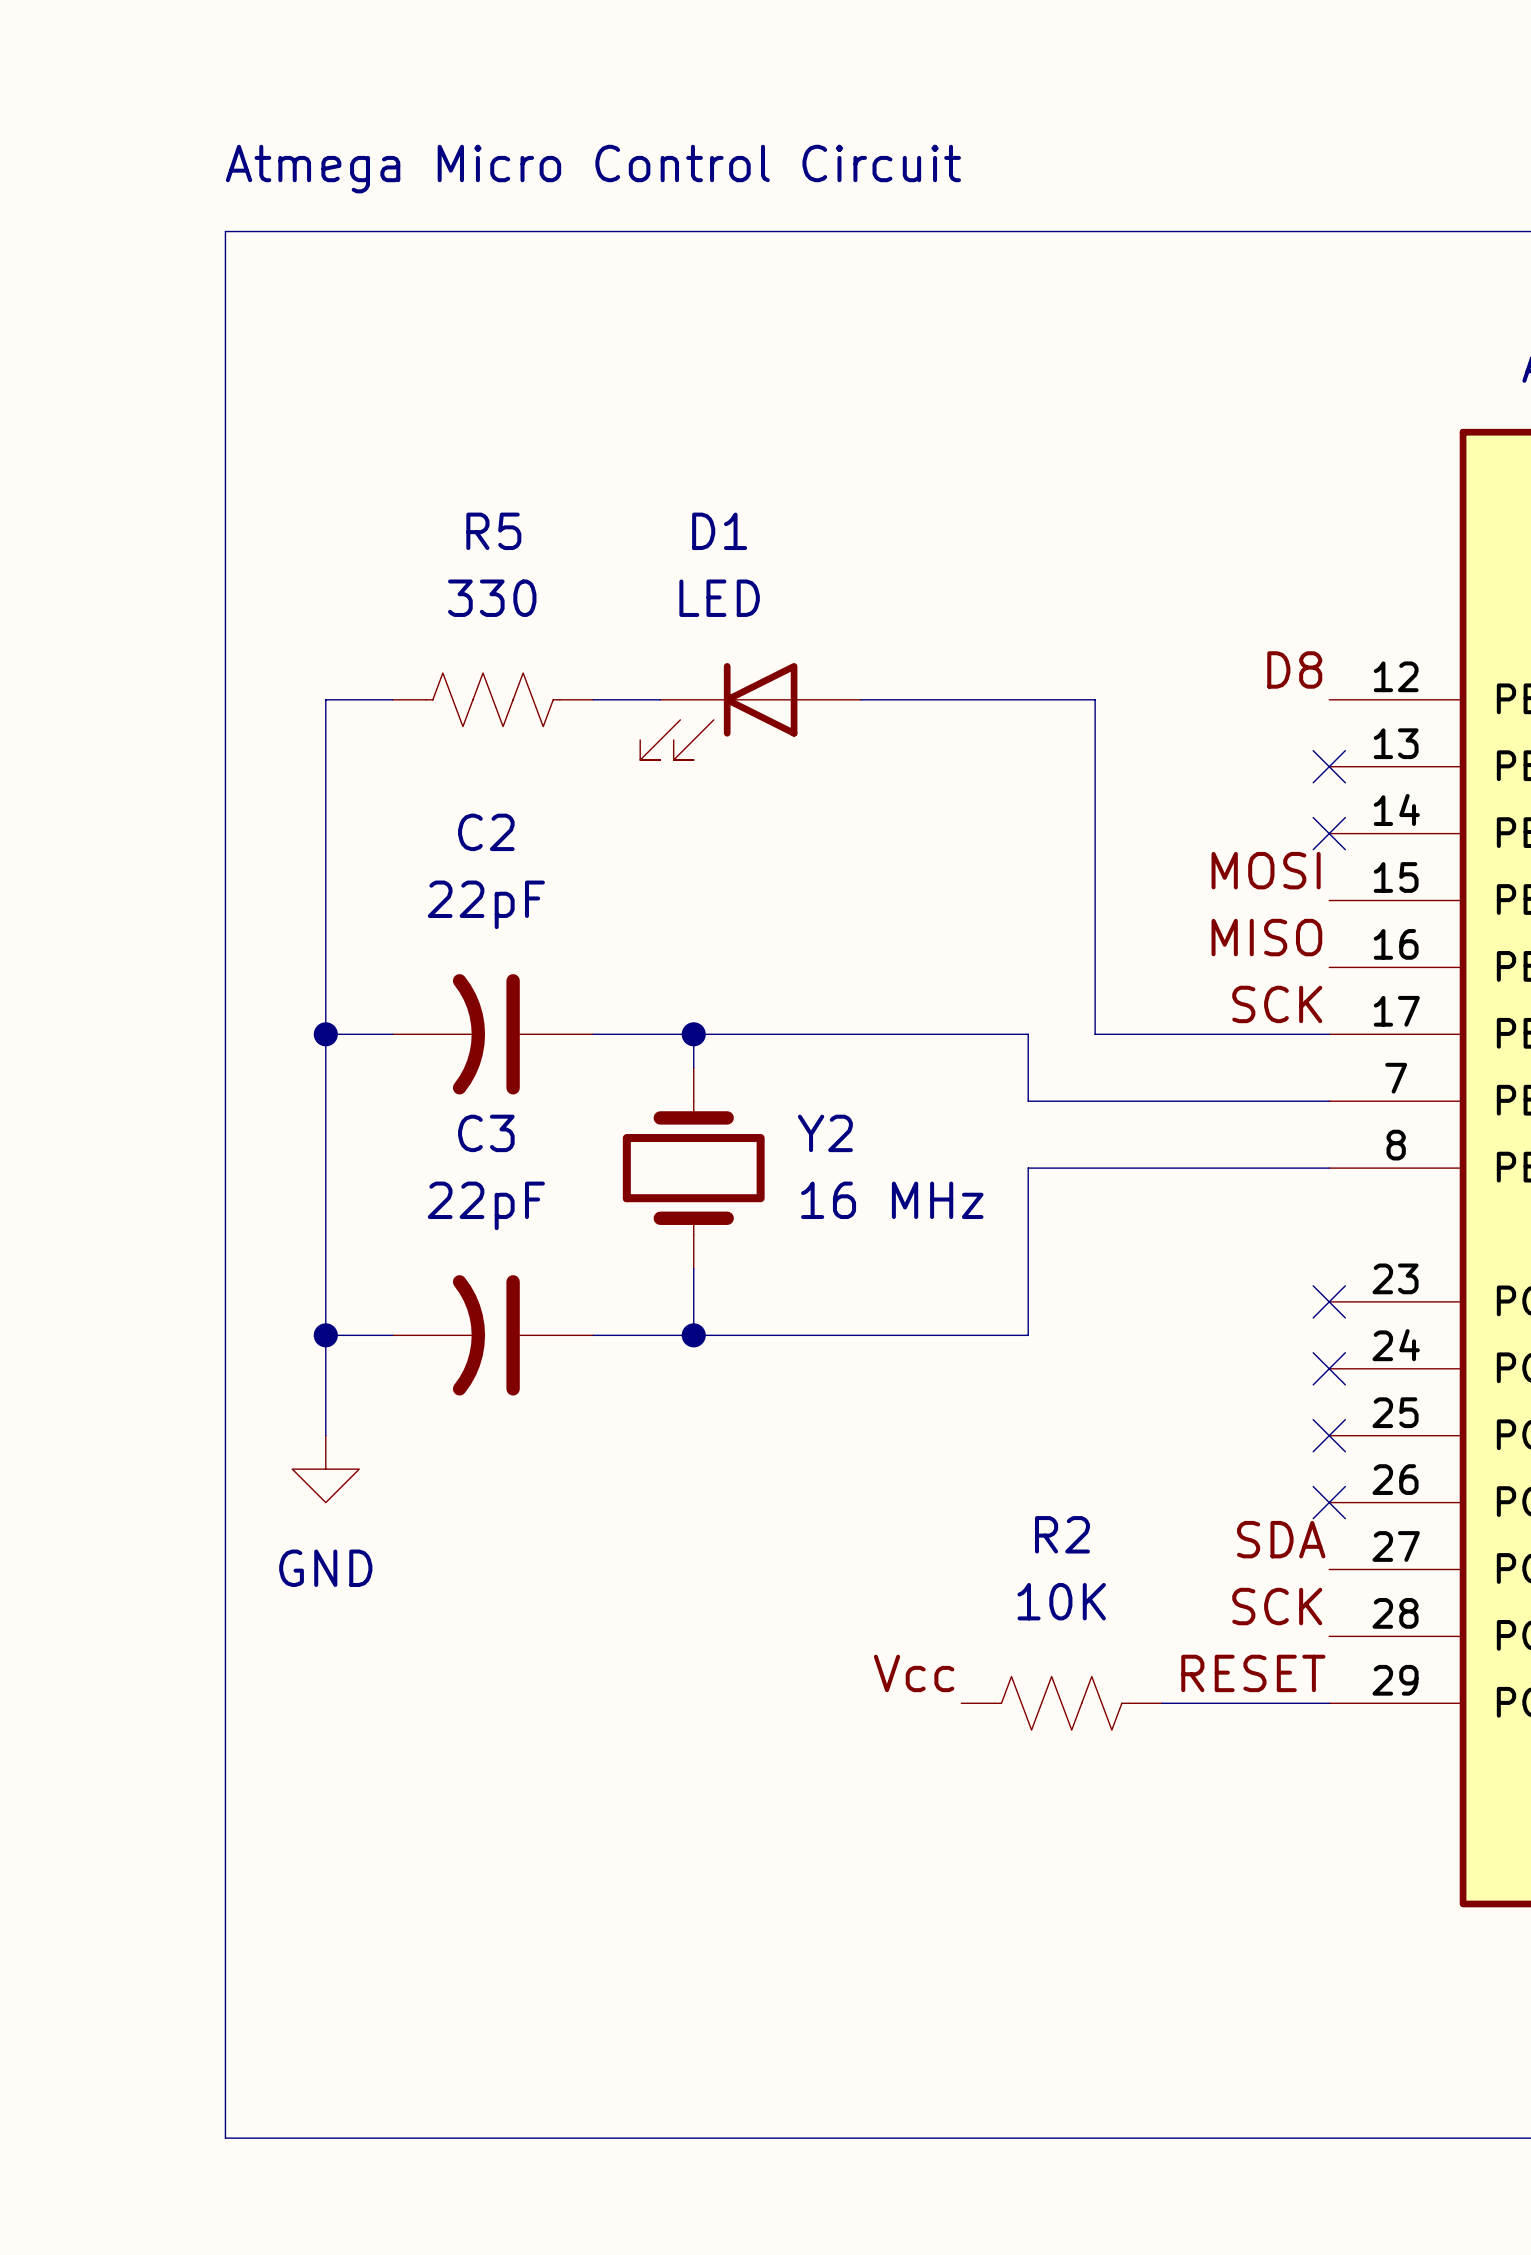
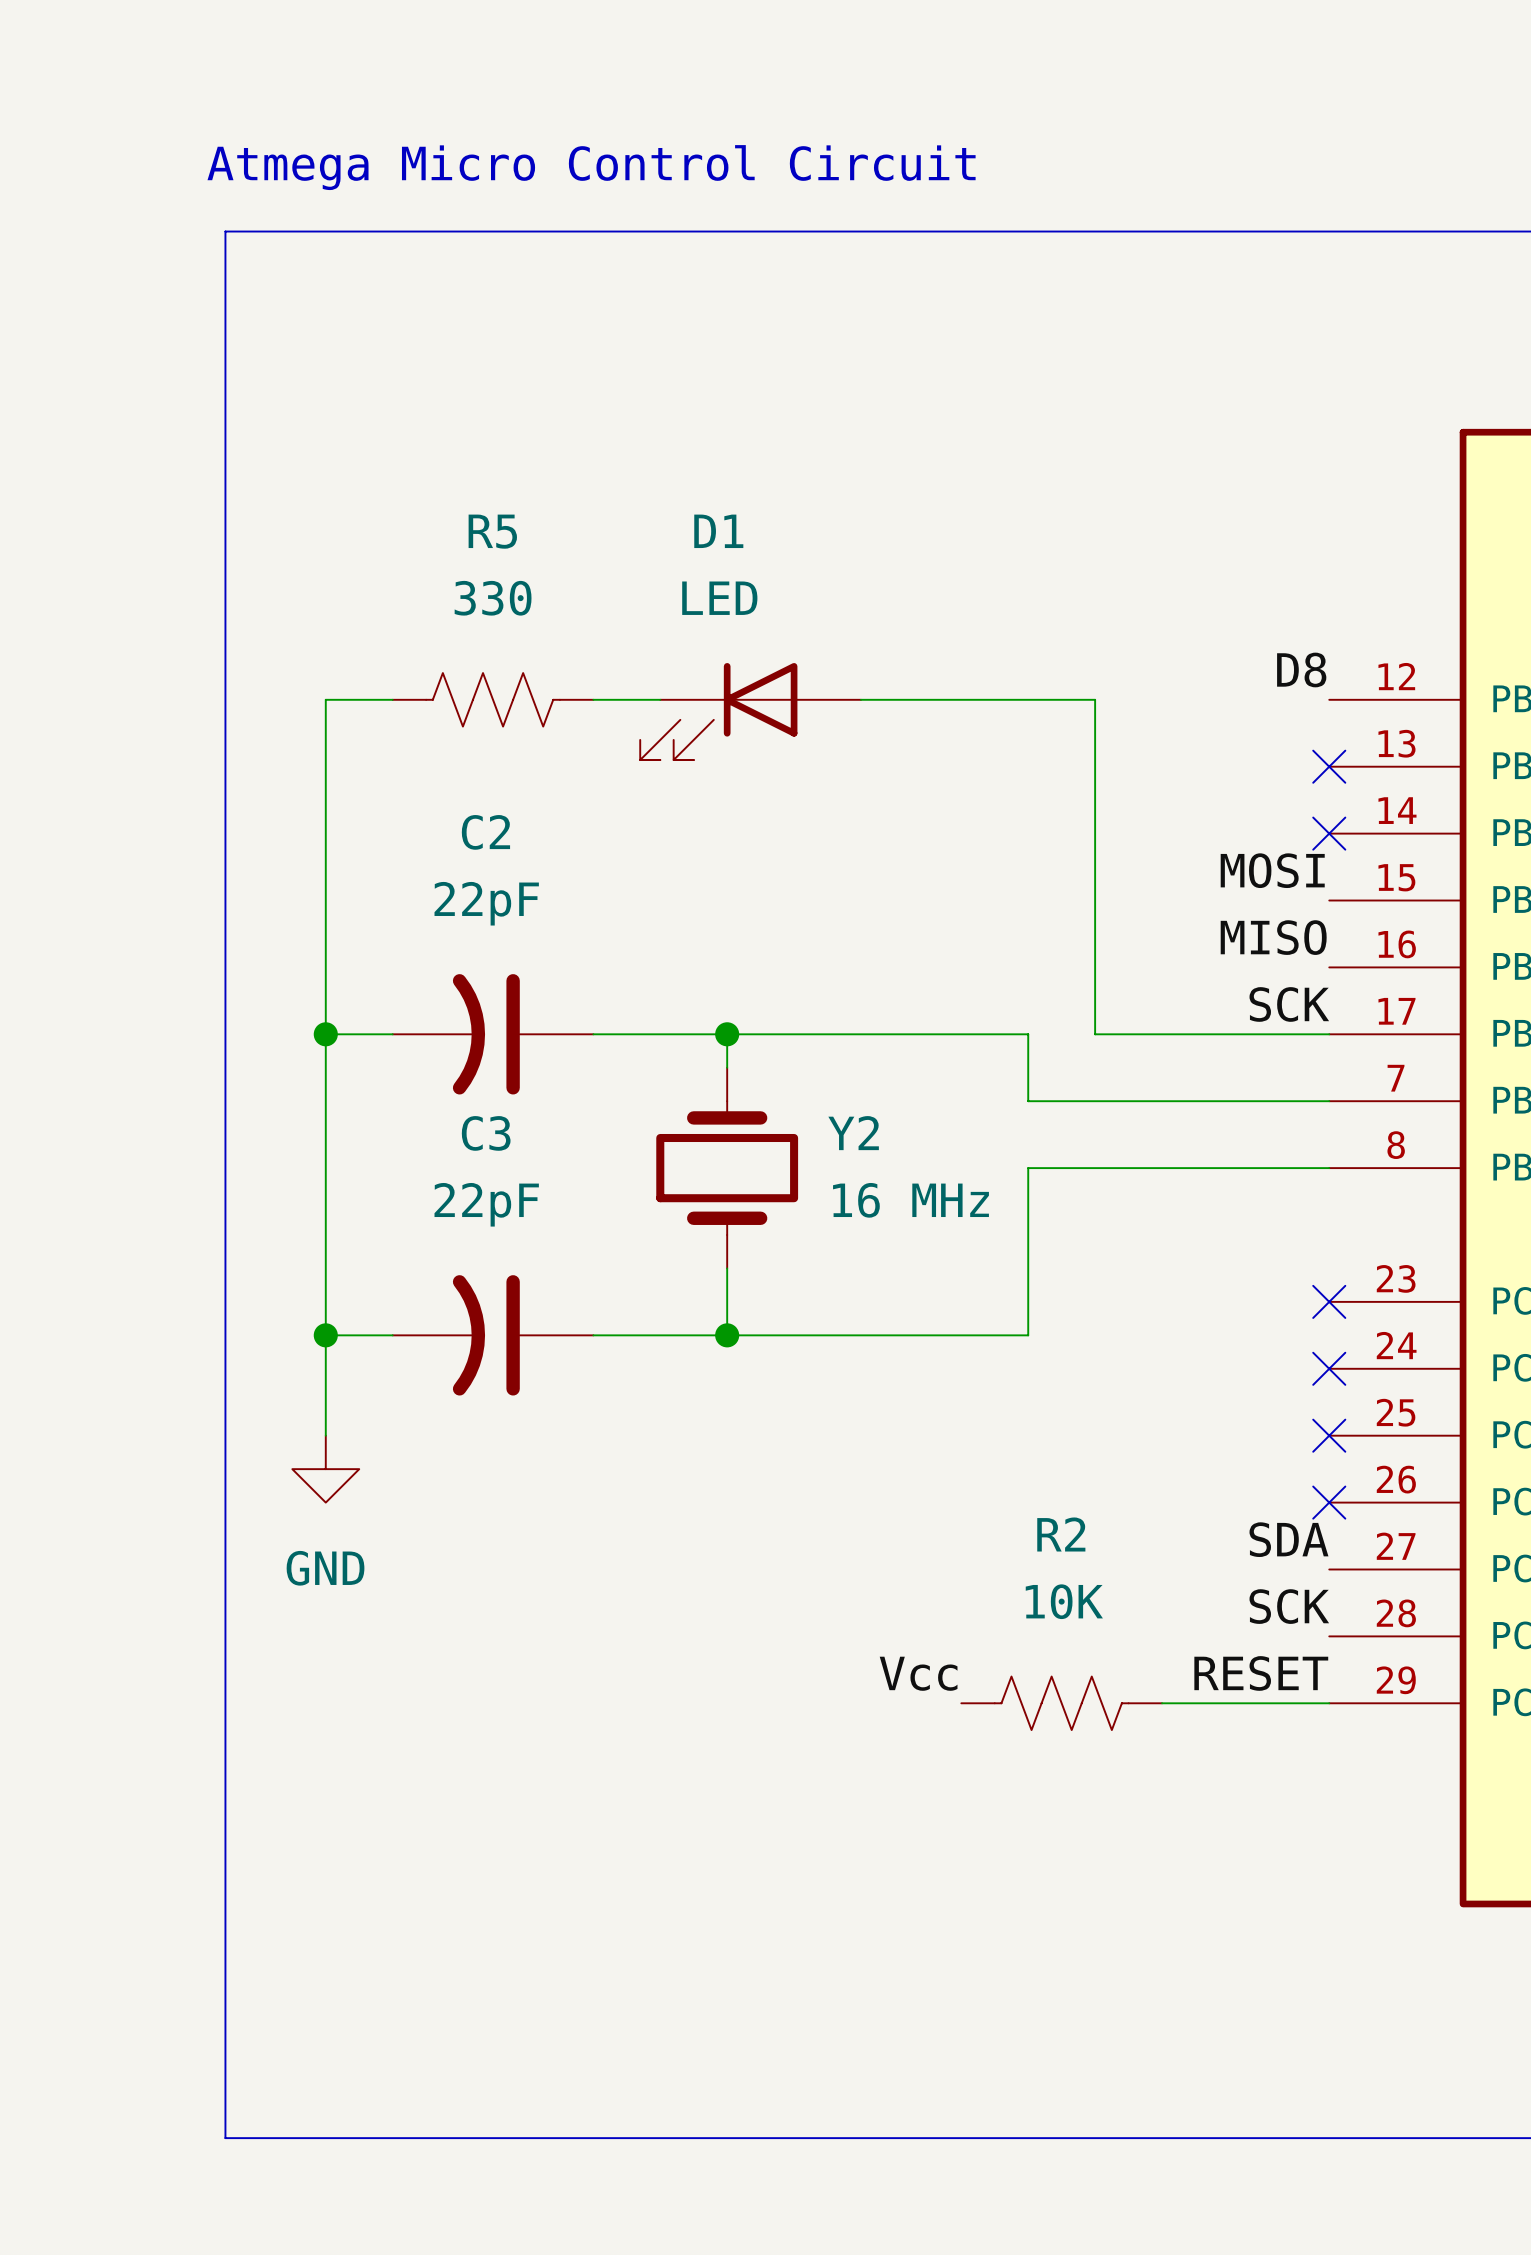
wire: (693, 1034) (693, 1067) -> (727, 1034) (727, 1067)
junction position: (693, 1034) -> (727, 1034)
Y2 position: (693, 1168) -> (727, 1168)
wire: (693, 1268) (693, 1335) -> (727, 1268) (727, 1335)
junction position: (693, 1335) -> (727, 1335)

